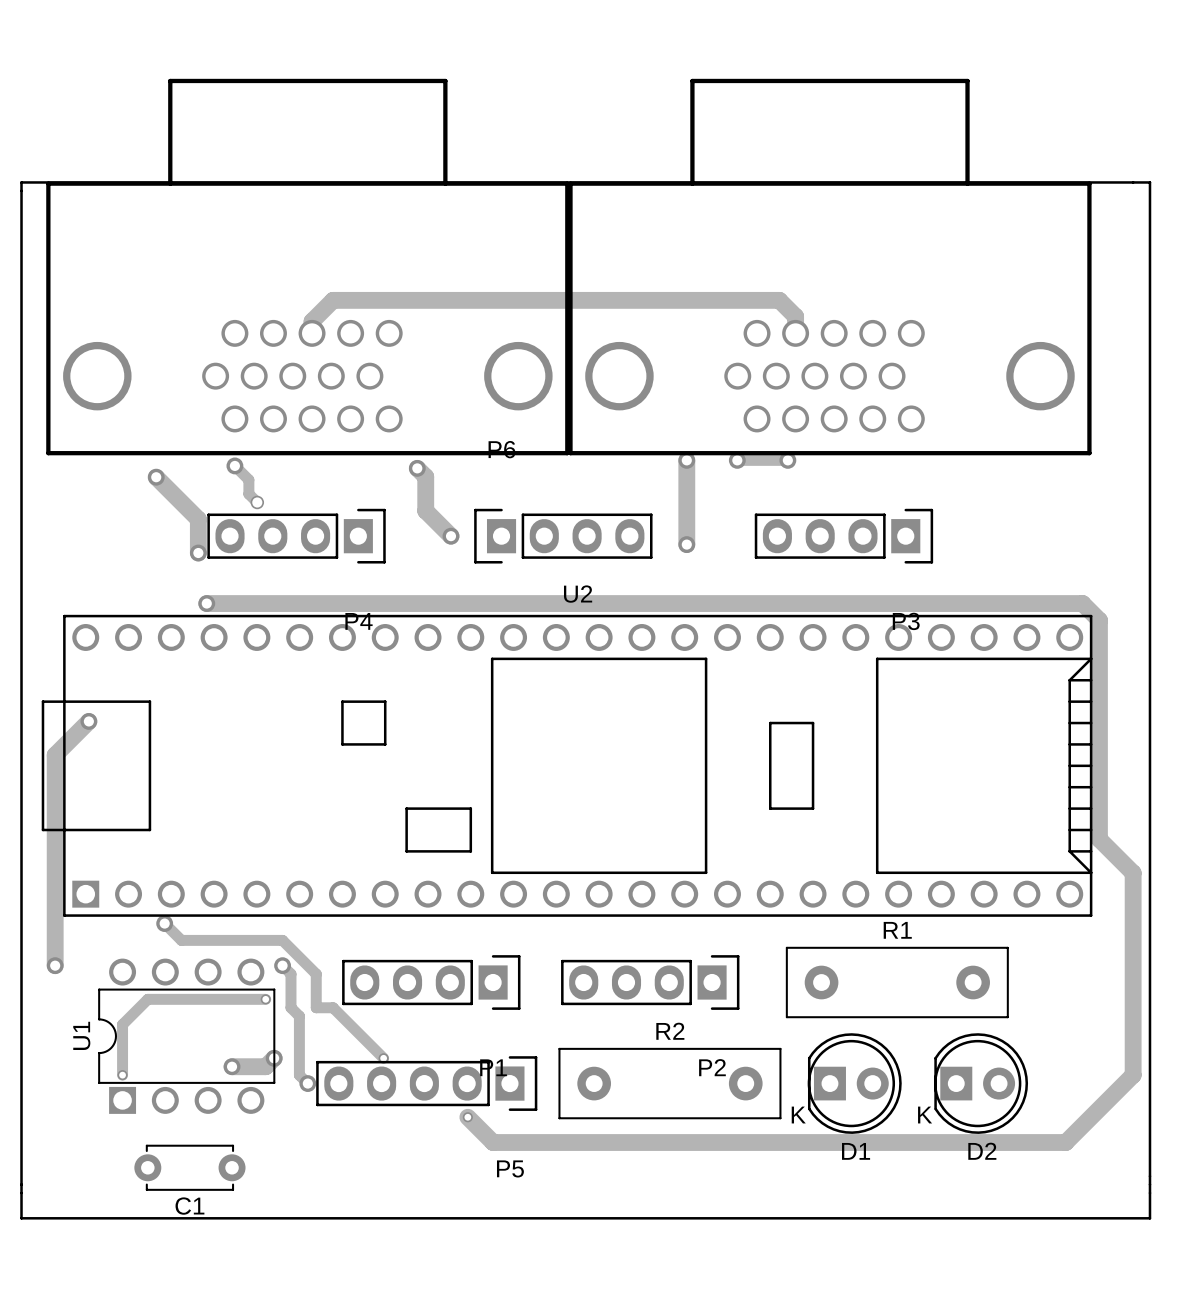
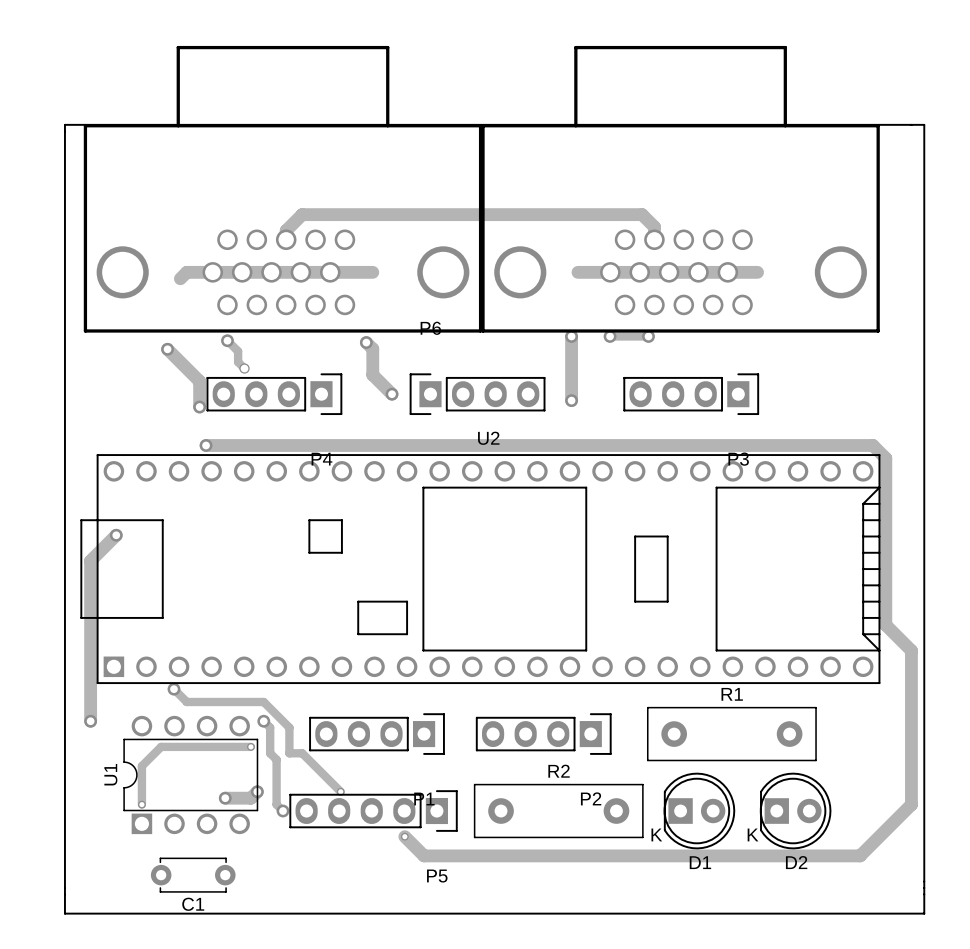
track: none -> (372, 272) (186, 272) (180, 278)
track: none -> (577, 272) (757, 272)

